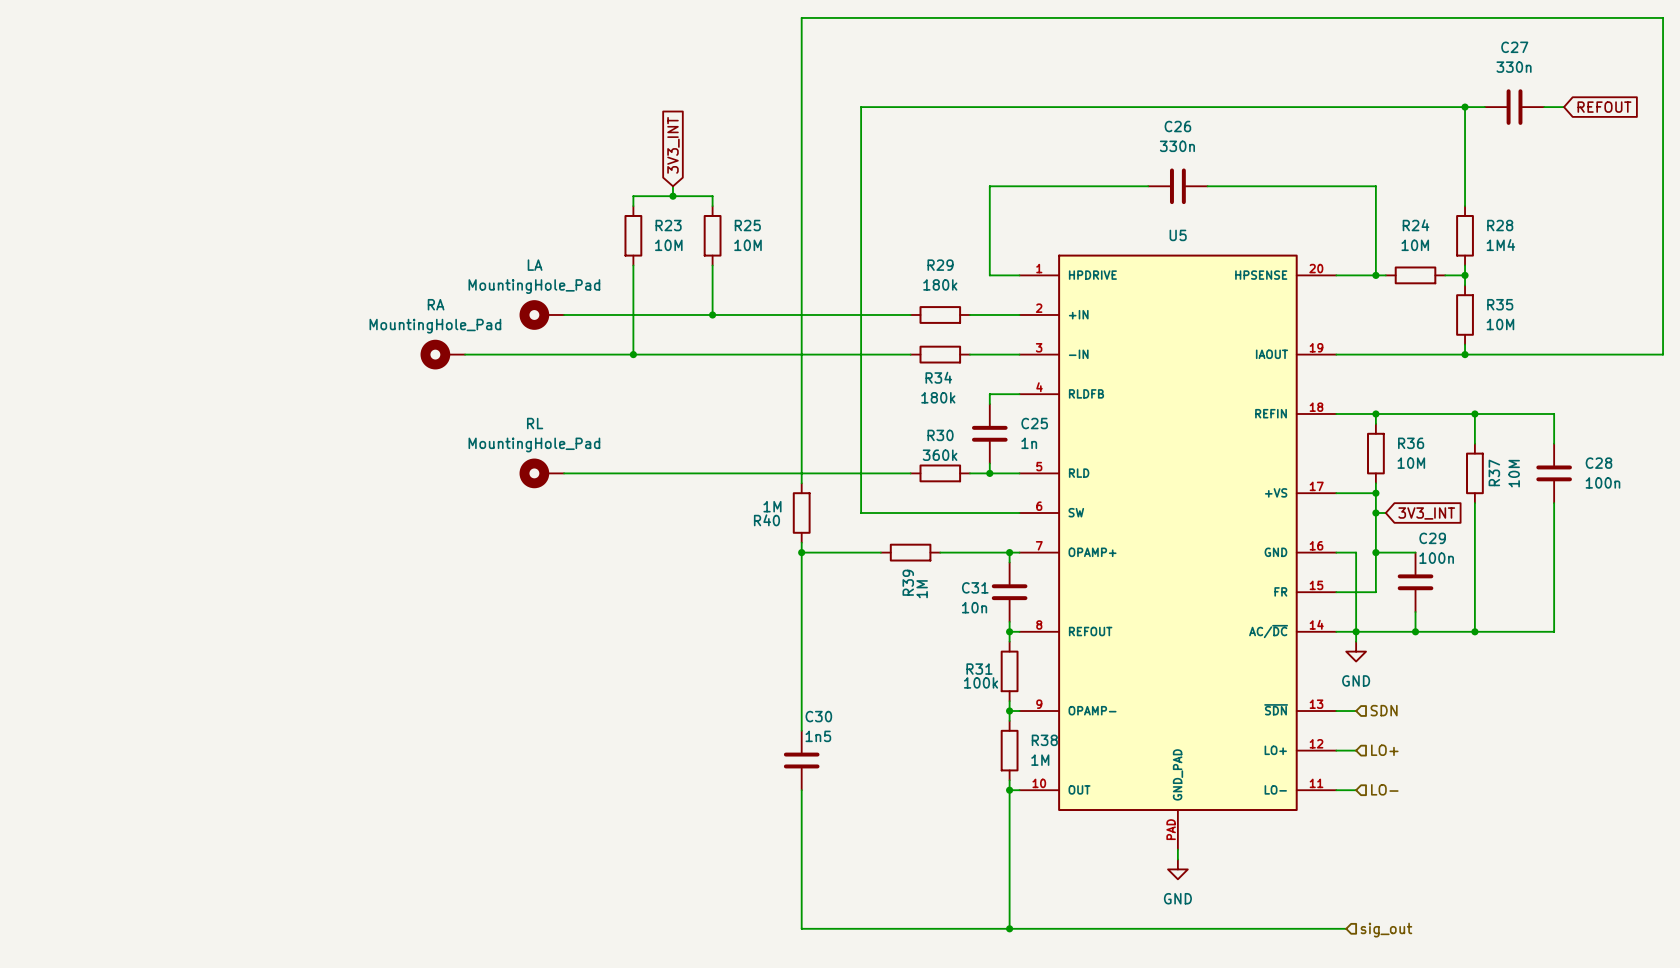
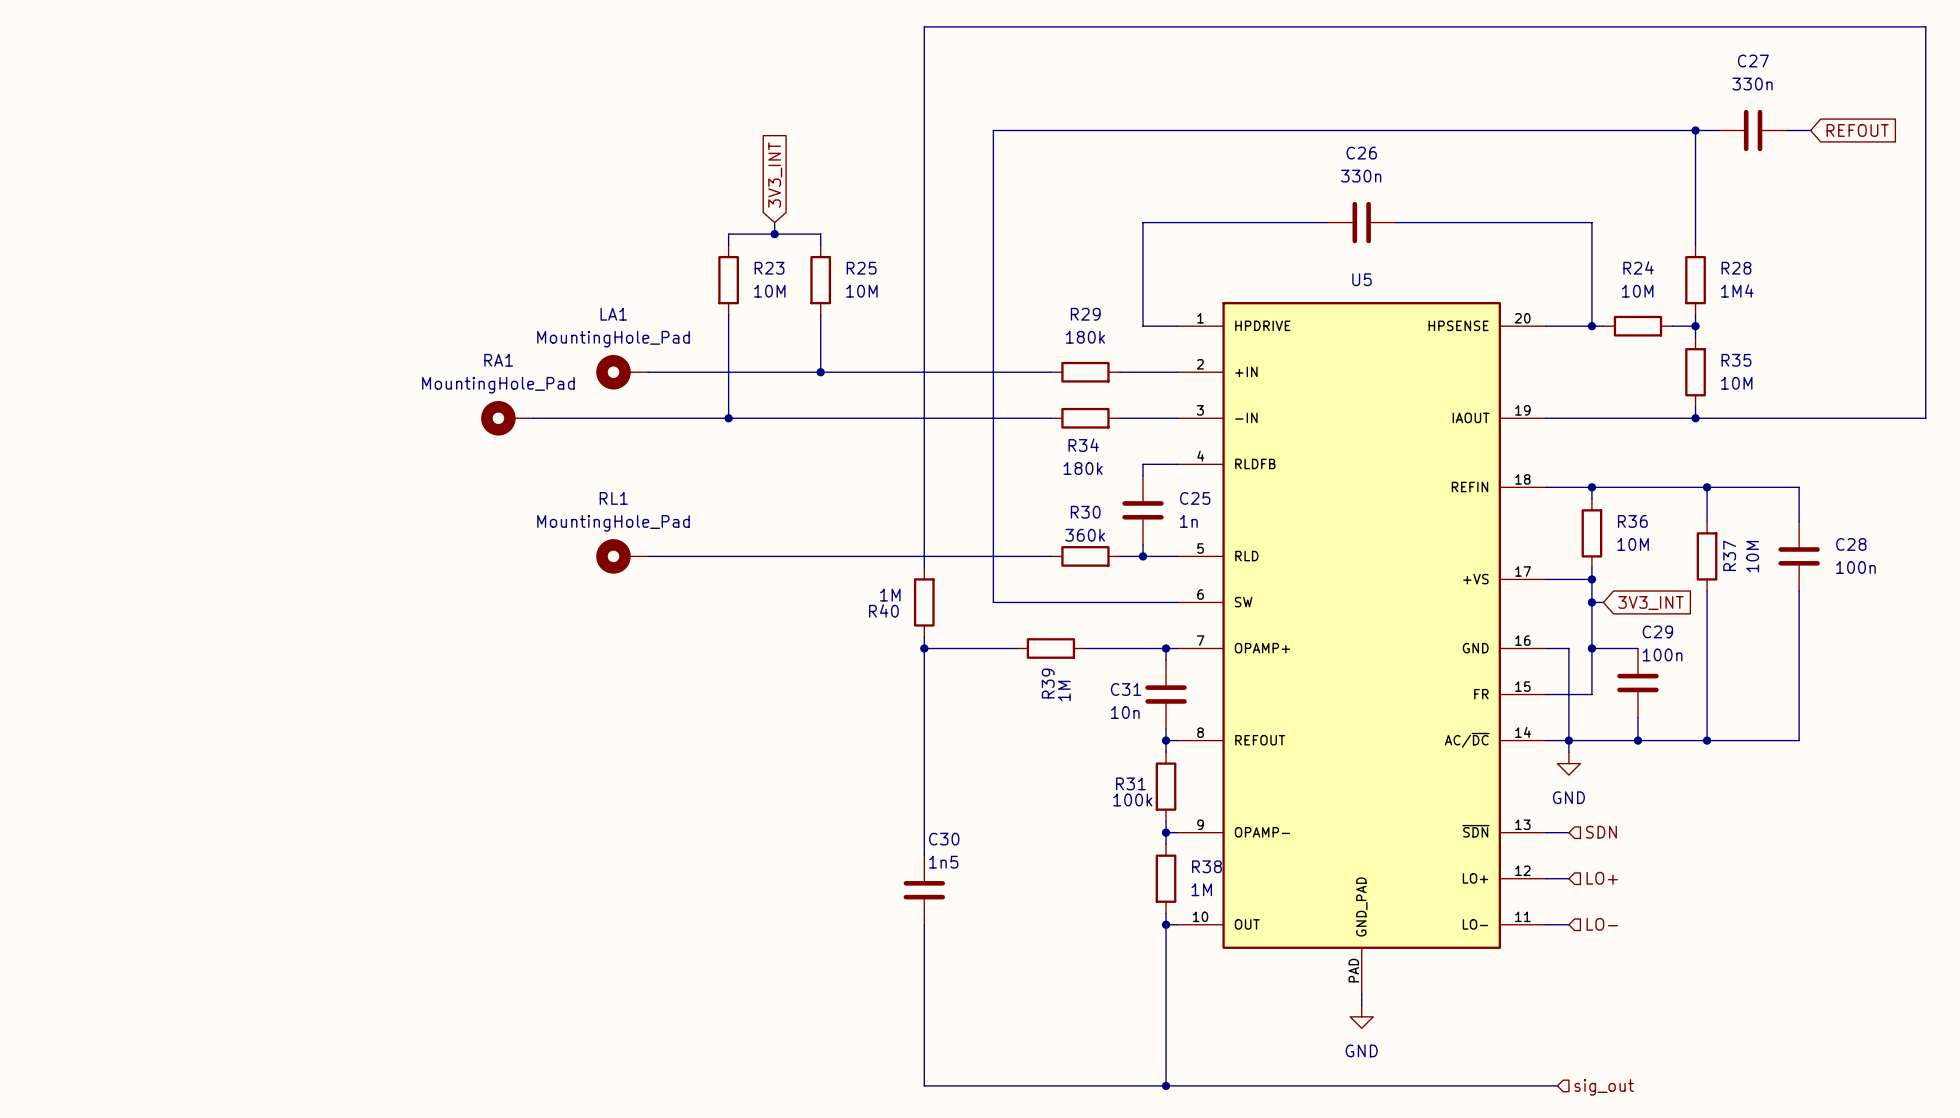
LA name: LA (535, 265) -> LA1 (613, 314)
RA name: RA (436, 304) -> RA1 (498, 360)
RL name: RL (535, 423) -> RL1 (613, 498)

